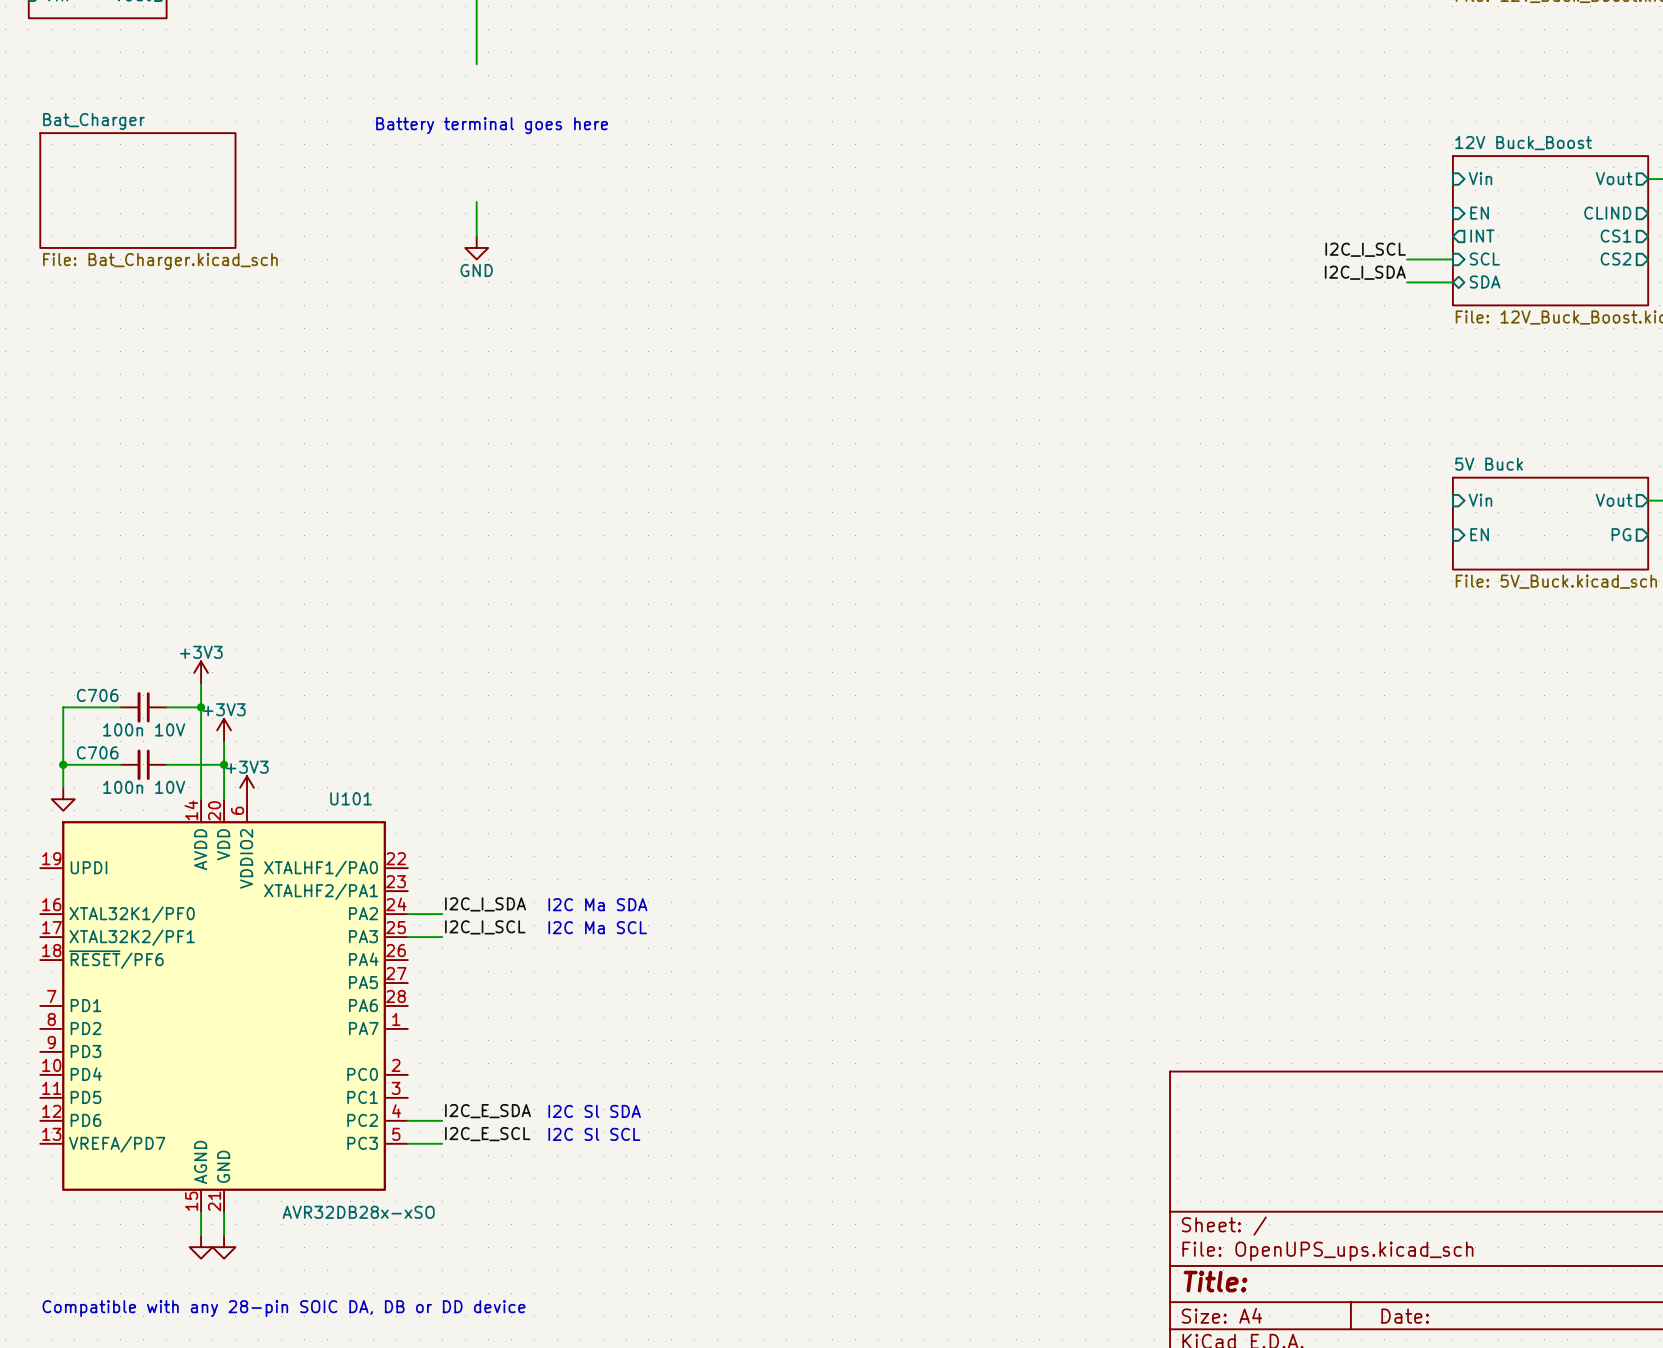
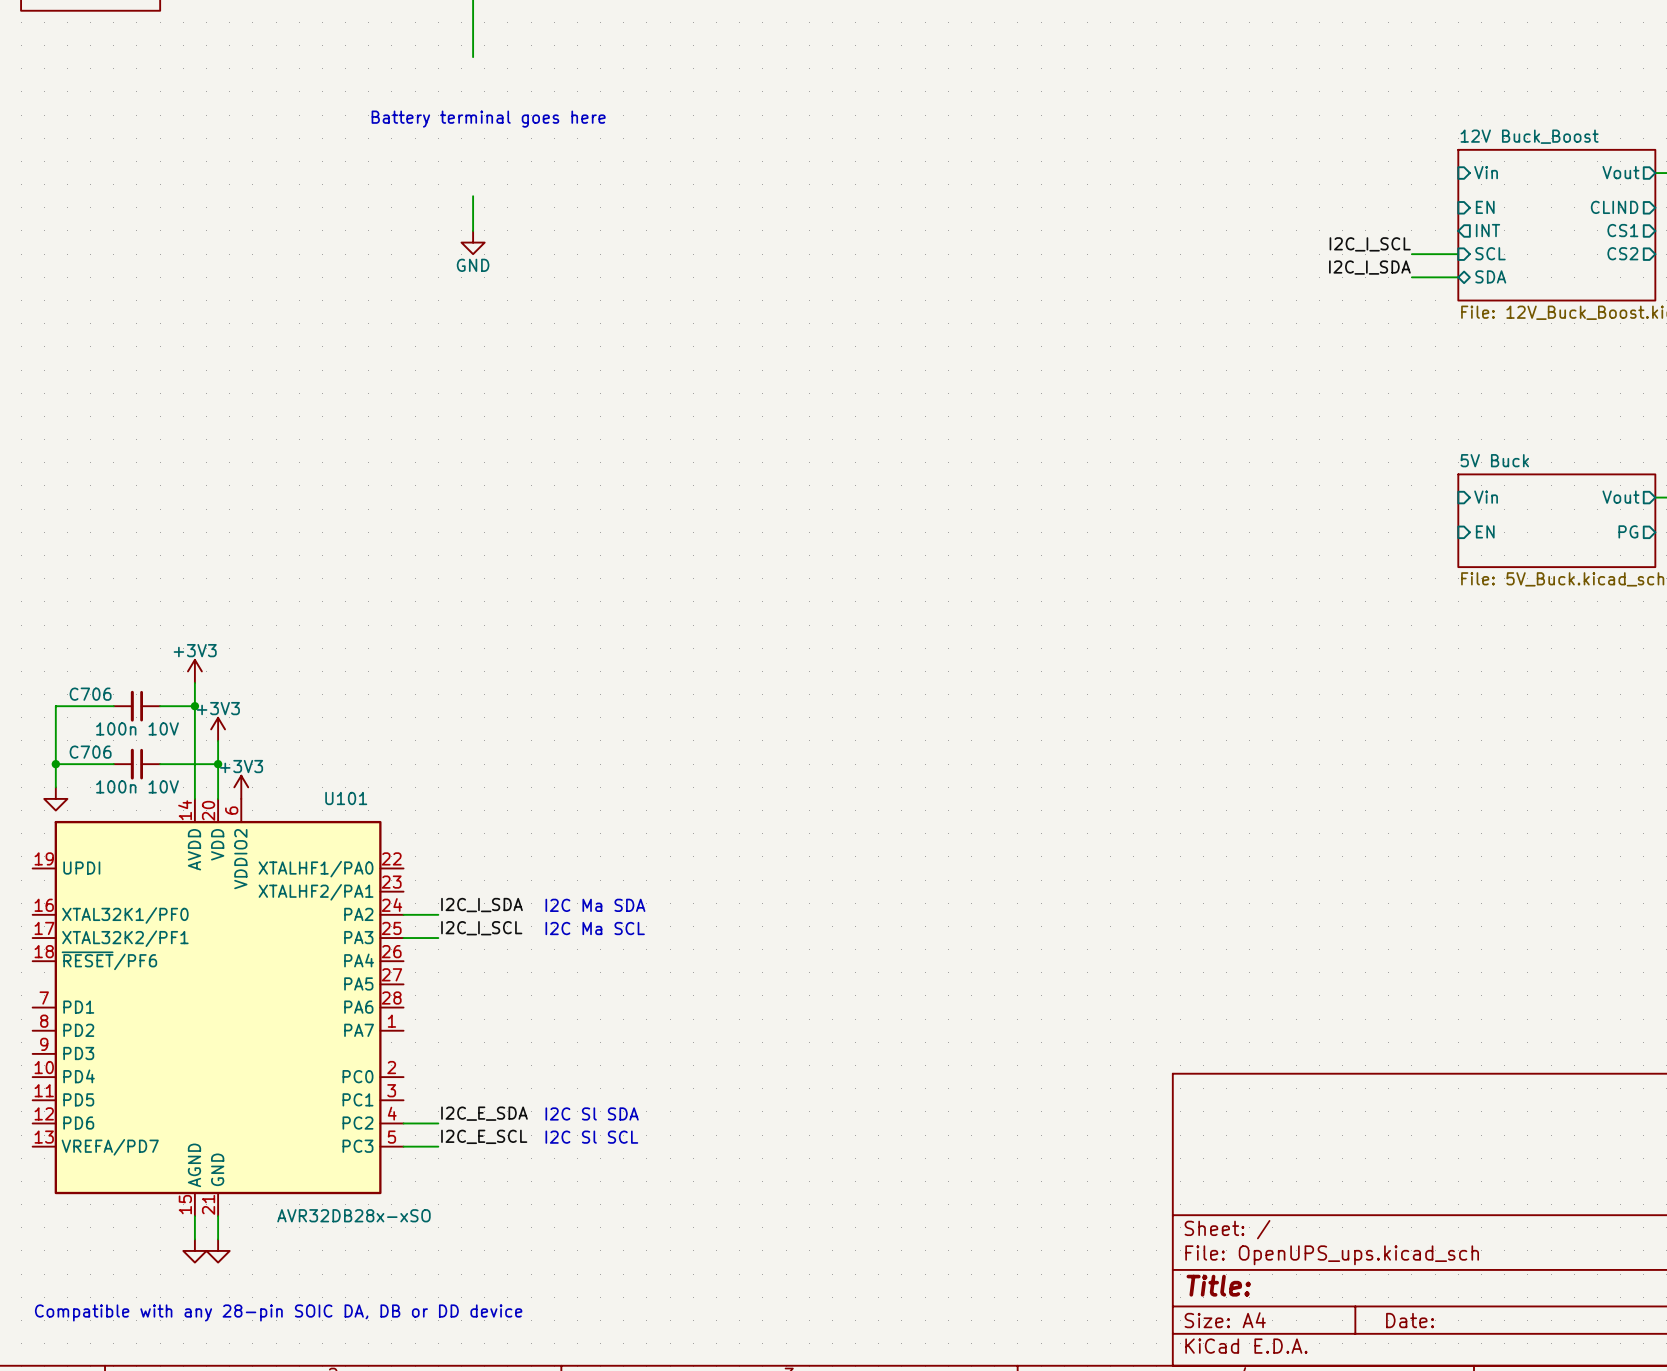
sheet Bat_Charger: File: Bat_Charger.kicad_sch (137, 190) -> none

